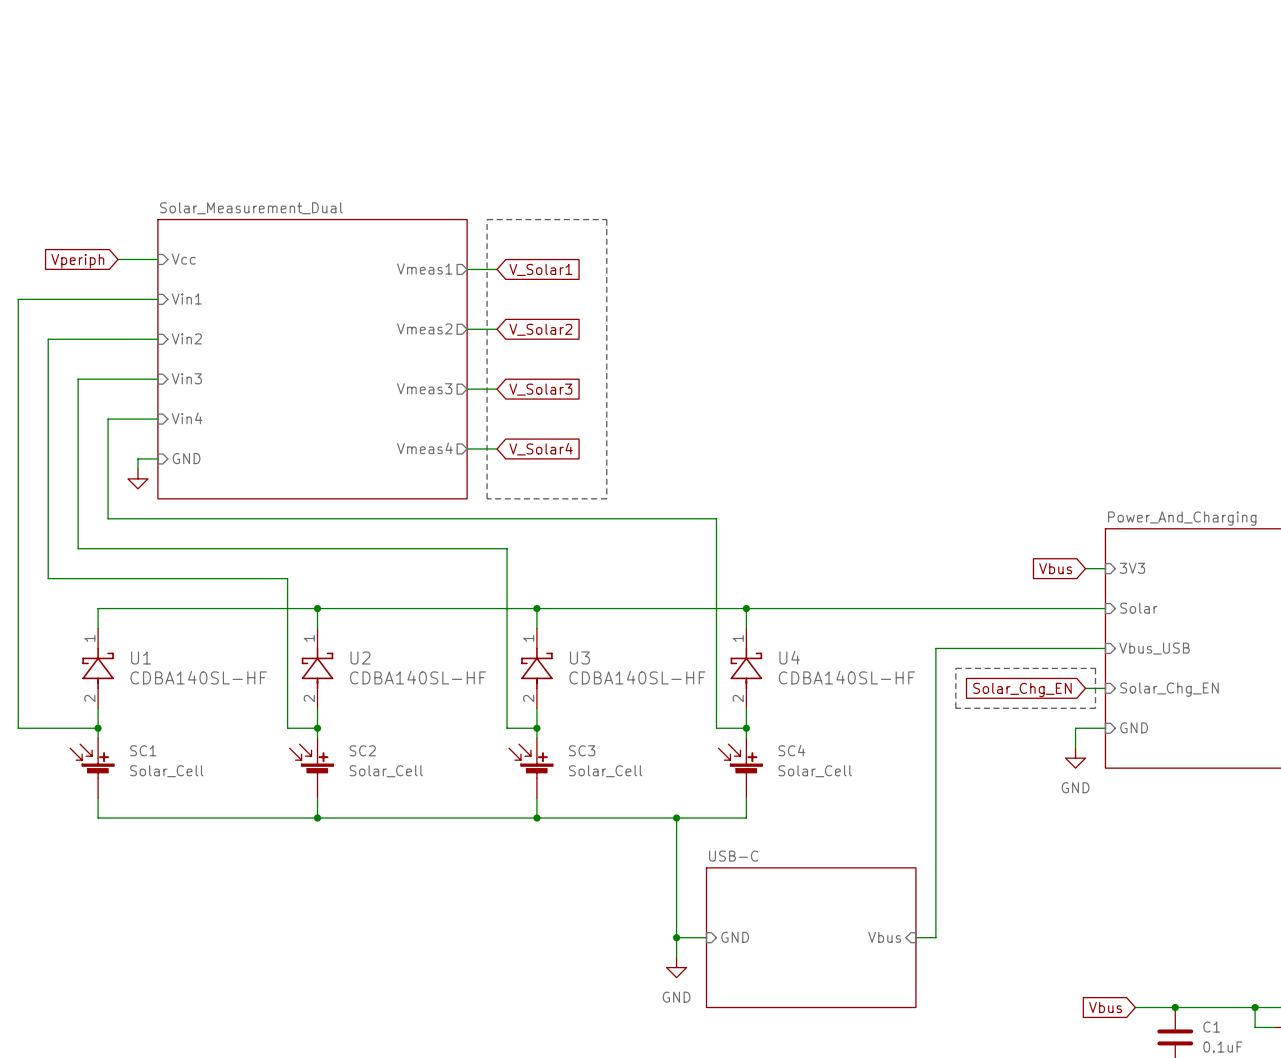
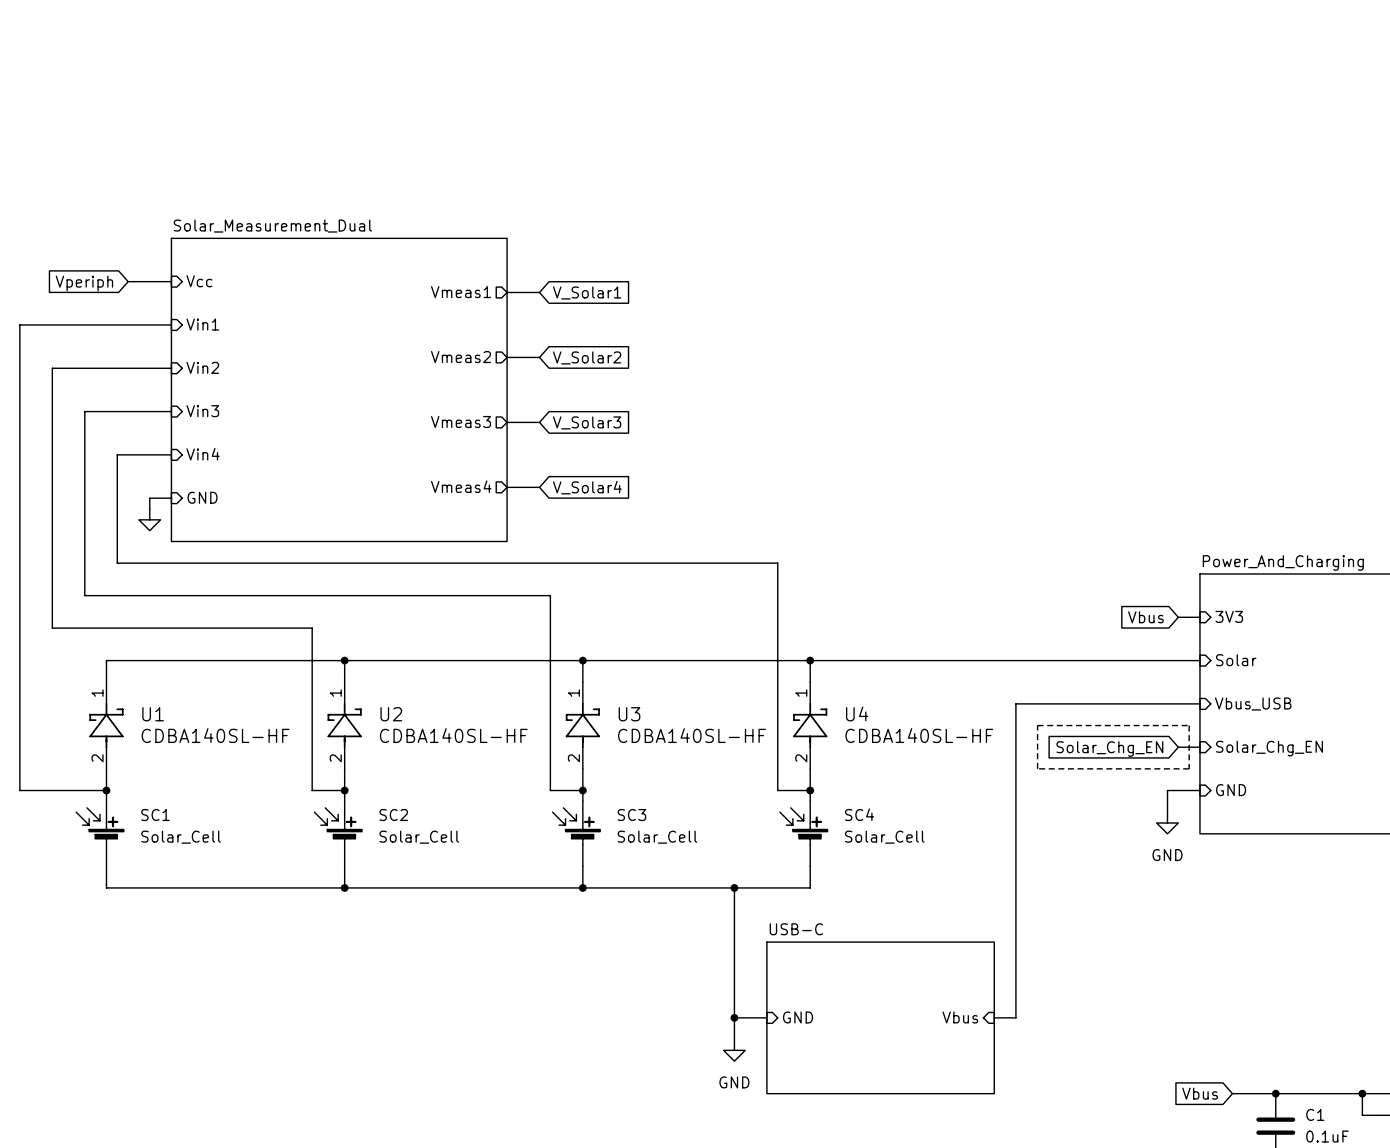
line: (487, 219) (606, 219) (606, 498) (487, 498) (487, 219) -> none

